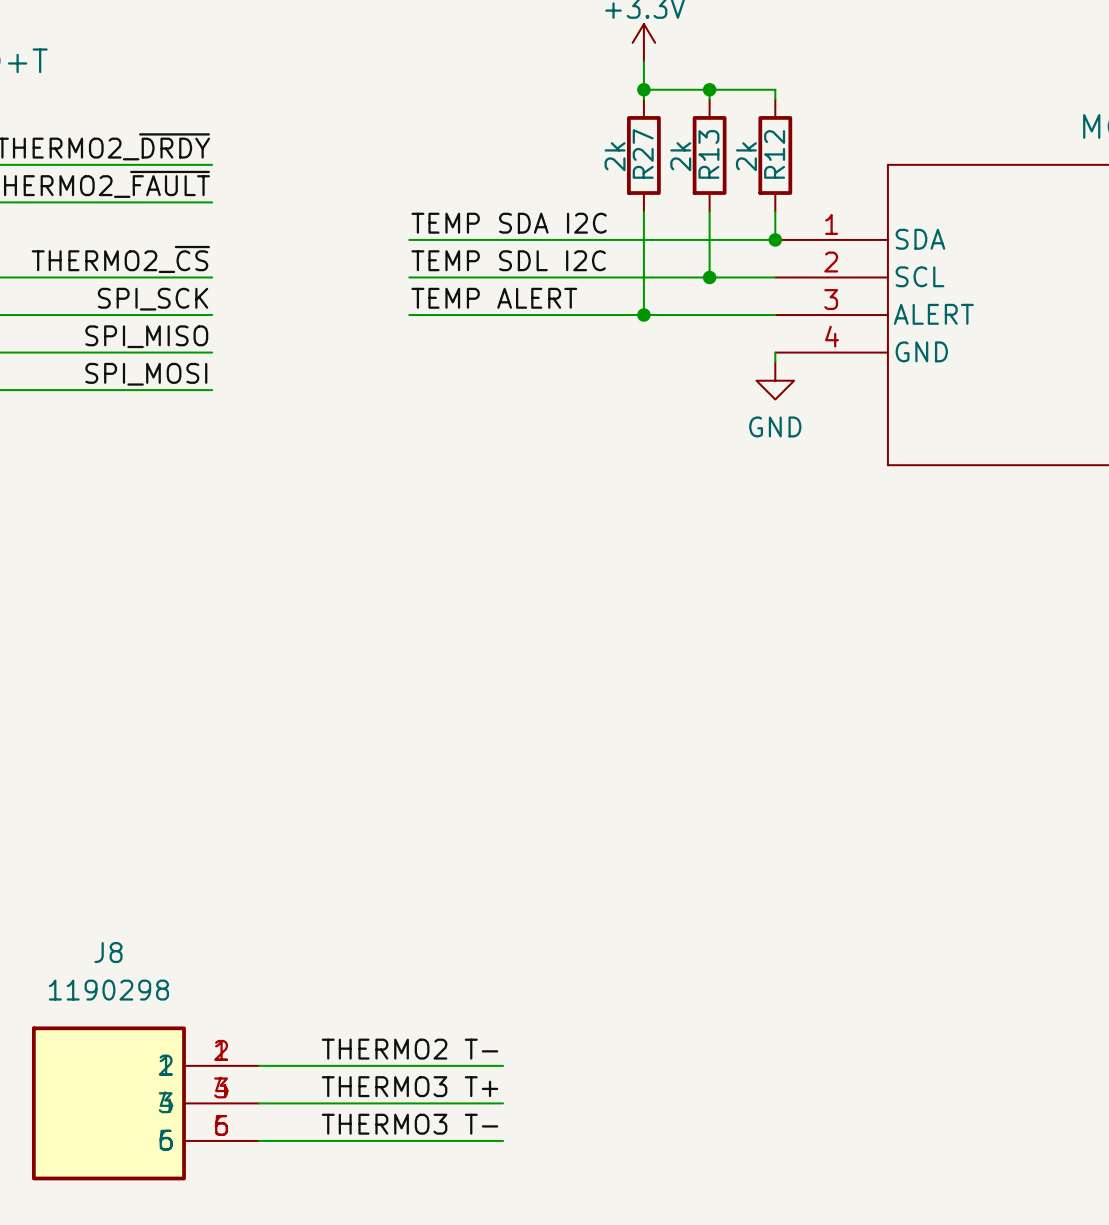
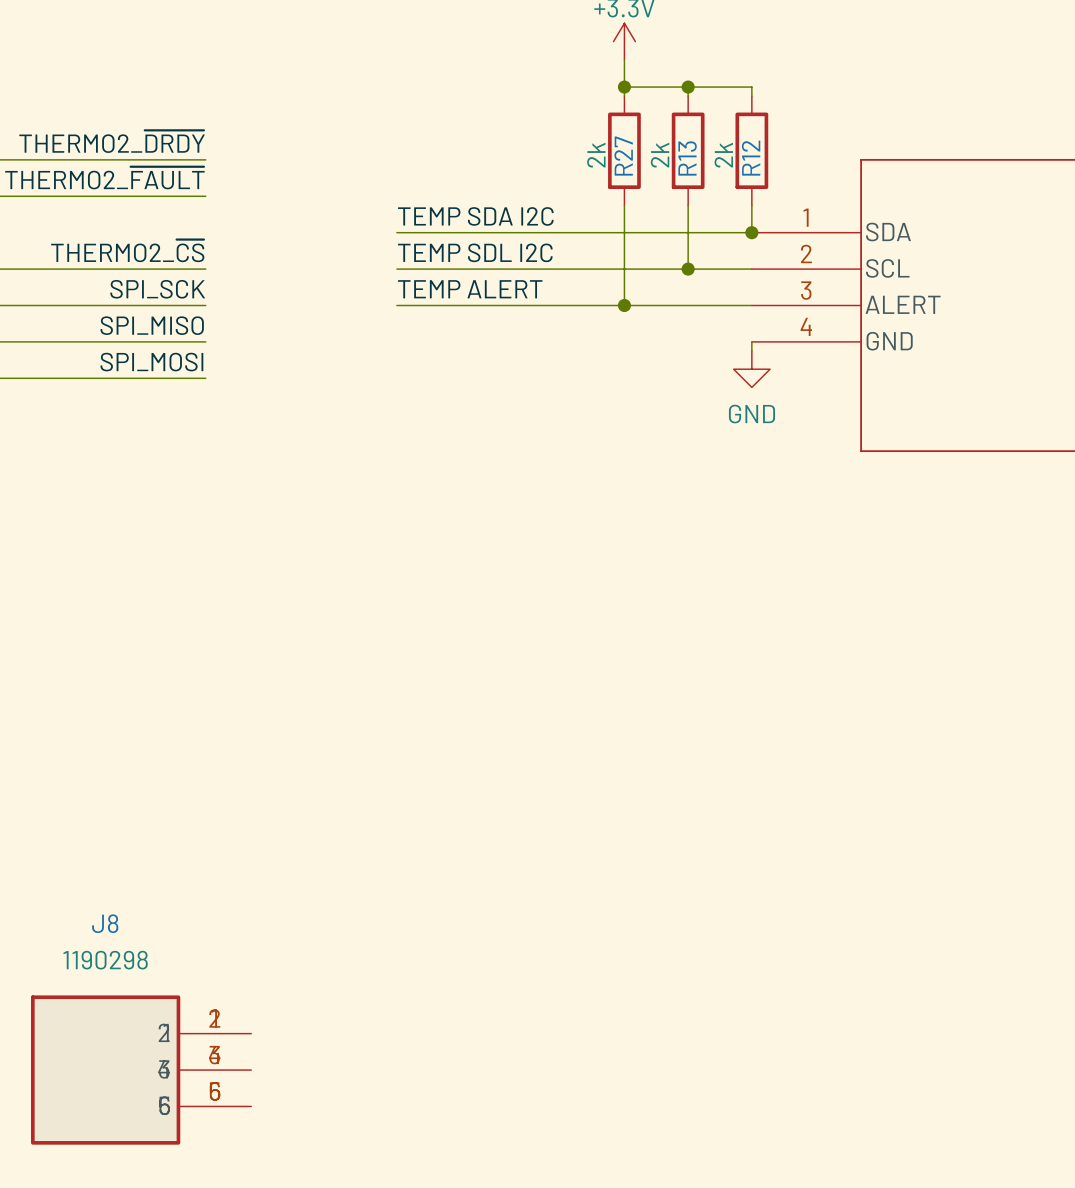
label: THERMO2 T- (410, 1049) -> none
wire: (259, 1065) (503, 1065) -> none
label: THERMO3 T+ (410, 1086) -> none
wire: (259, 1103) (503, 1103) -> none
label: THERMO3 T- (410, 1124) -> none
wire: (259, 1140) (503, 1140) -> none

